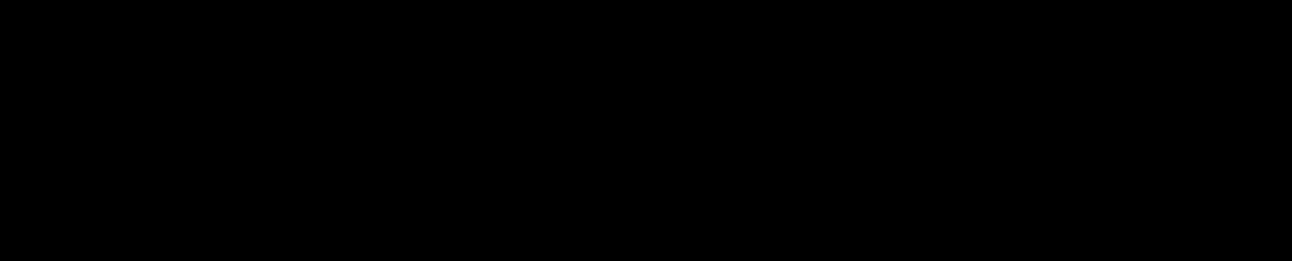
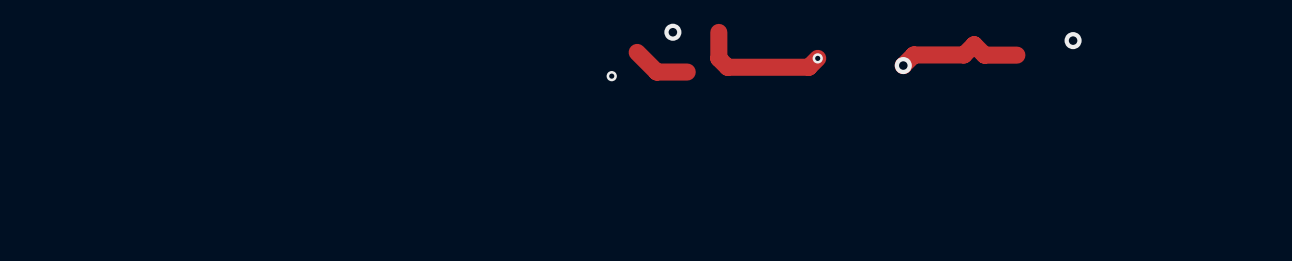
via: none -> (672, 32)
track: none -> (718, 32) (718, 58) (727, 67) (808, 67) (817, 58)
via: none -> (1073, 40)
track: none -> (637, 52) (656, 72) (687, 72)
track: none -> (1016, 55) (984, 55) (974, 44) (963, 54) (913, 54) (903, 65)
via: none -> (817, 58)
via: none -> (903, 65)
via: none -> (611, 76)

